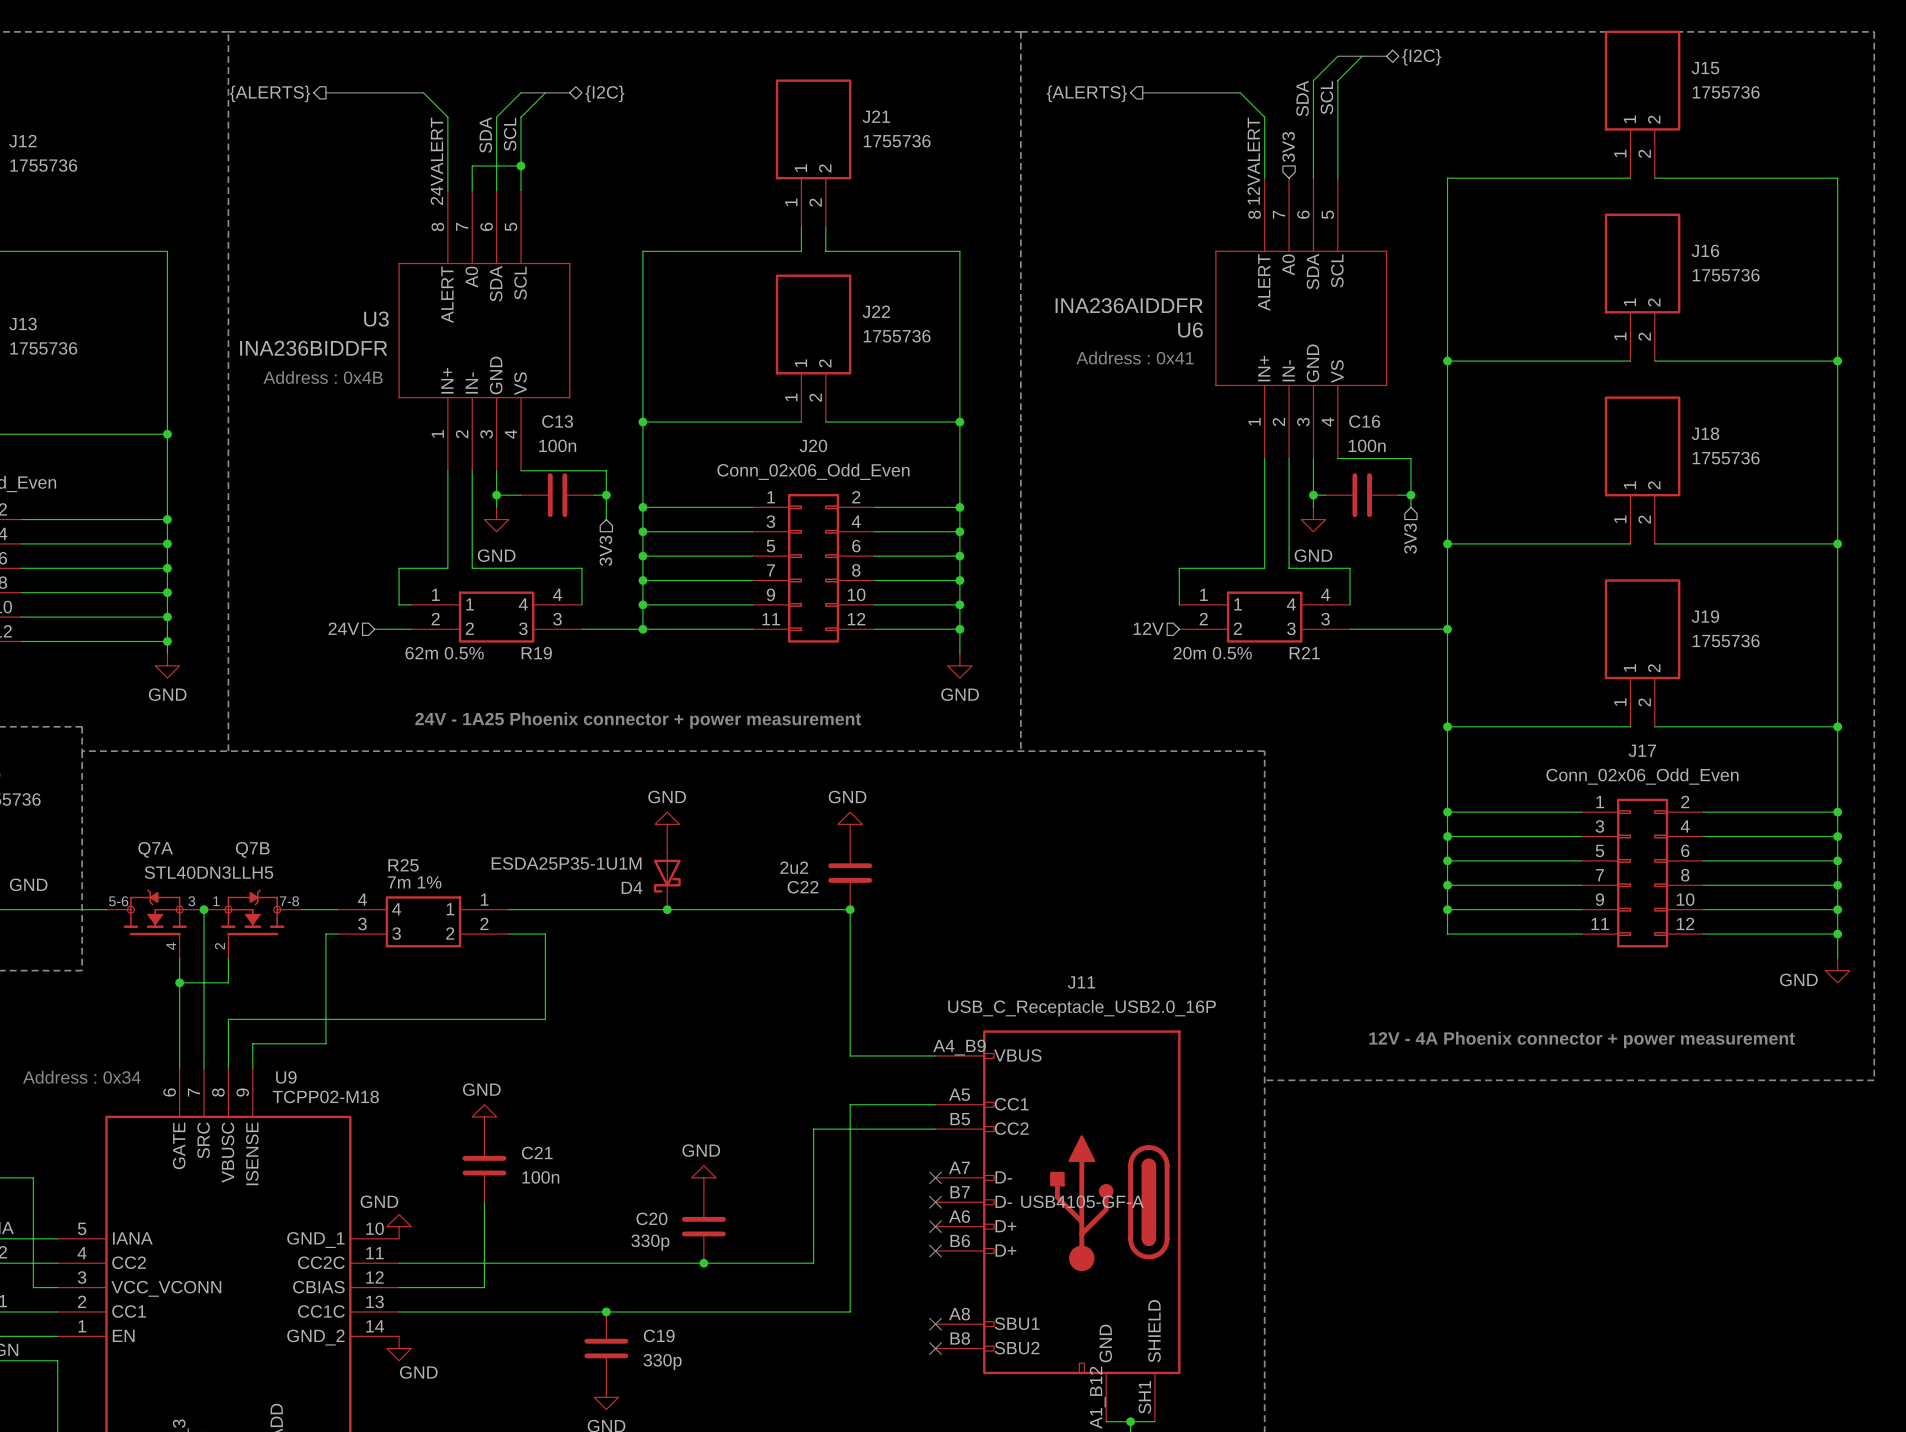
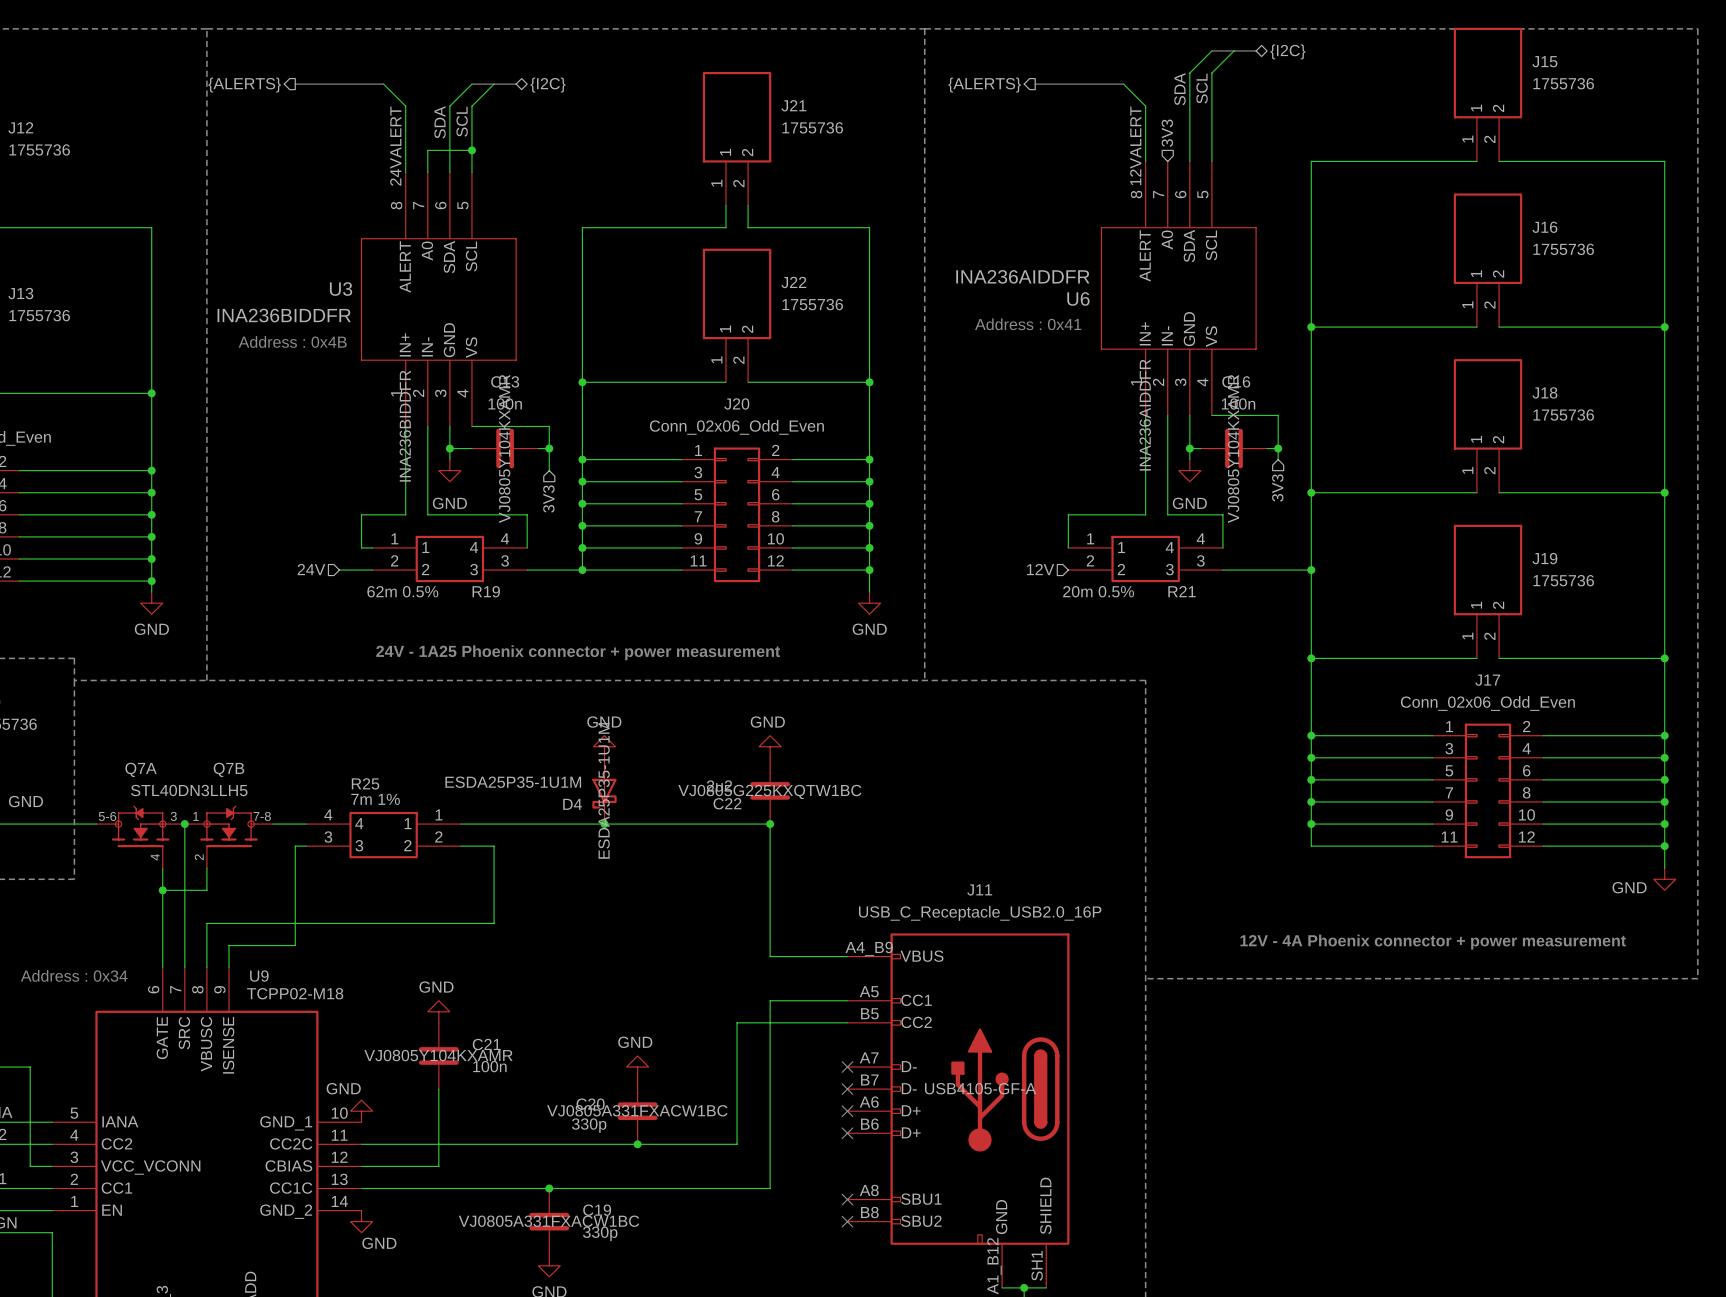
U6 text: none -> INA236AIDDFR (1145, 415)
U3 text: none -> INA236BIDDFR (405, 426)
C13 text: none -> VJ0805Y104KXAMR (504, 448)
C16 text: none -> VJ0805Y104KXAMR (1233, 448)
D4 text: none -> ESDA25P35-1U1M (604, 790)
C22 text: none -> VJ0805G225KXQTW1BC (769, 791)
C21 text: none -> VJ0805Y104KXAMR (438, 1055)
C20 text: none -> VJ0805A331FXACW1BC (637, 1110)
C19 text: none -> VJ0805A331FXACW1BC (549, 1221)

